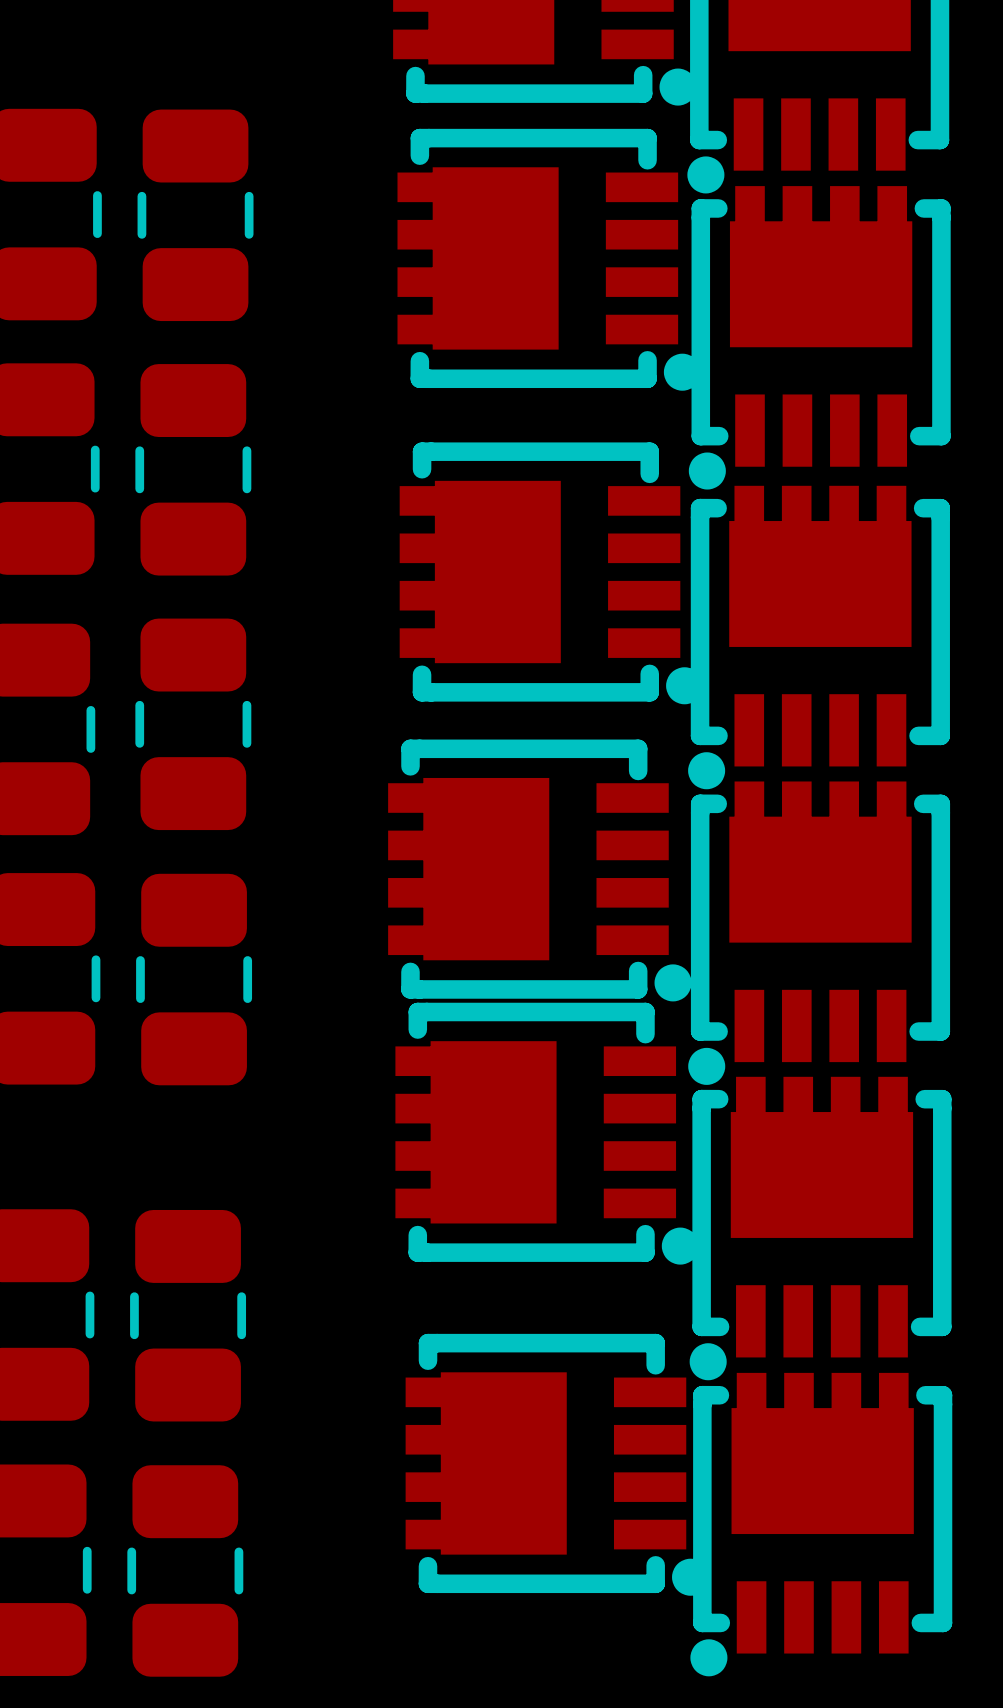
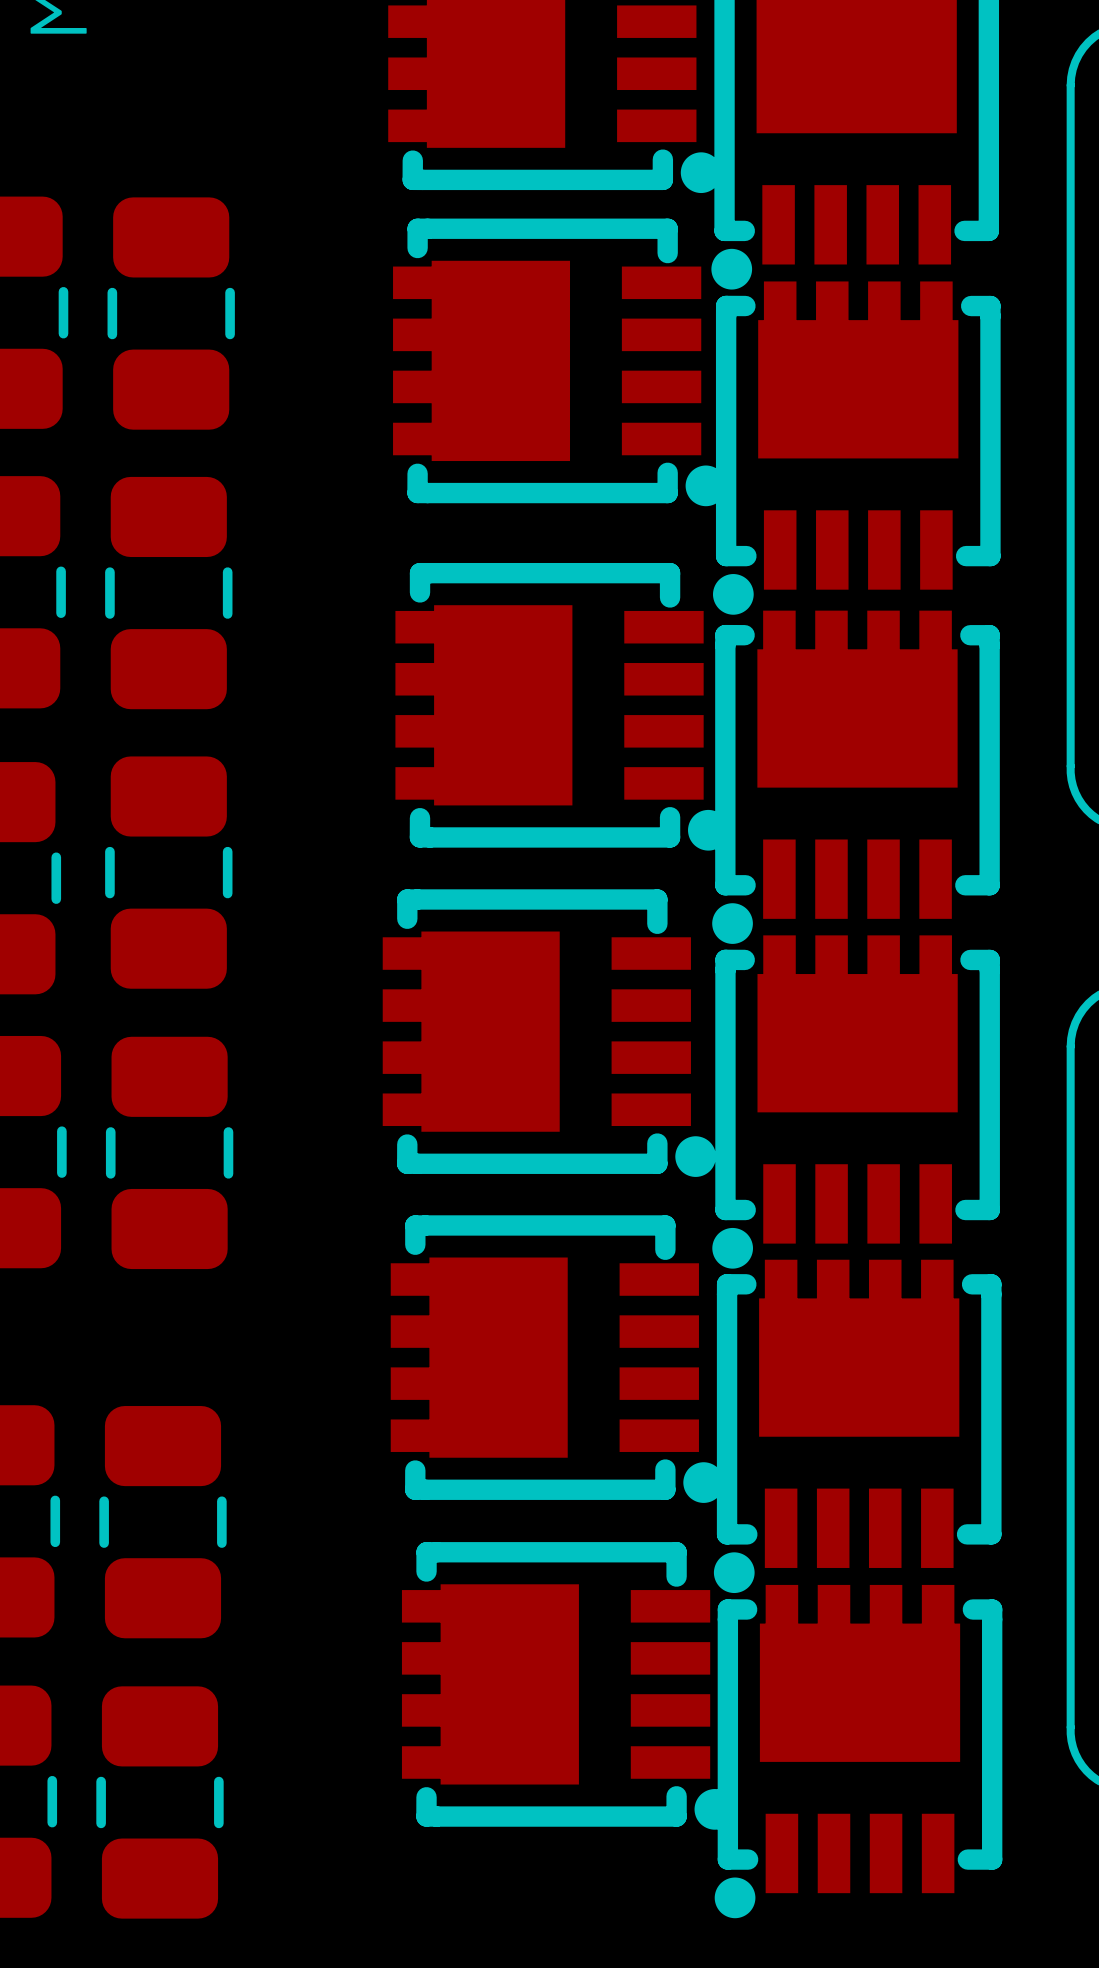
part position: (547, 1133) -> (557, 1359)

